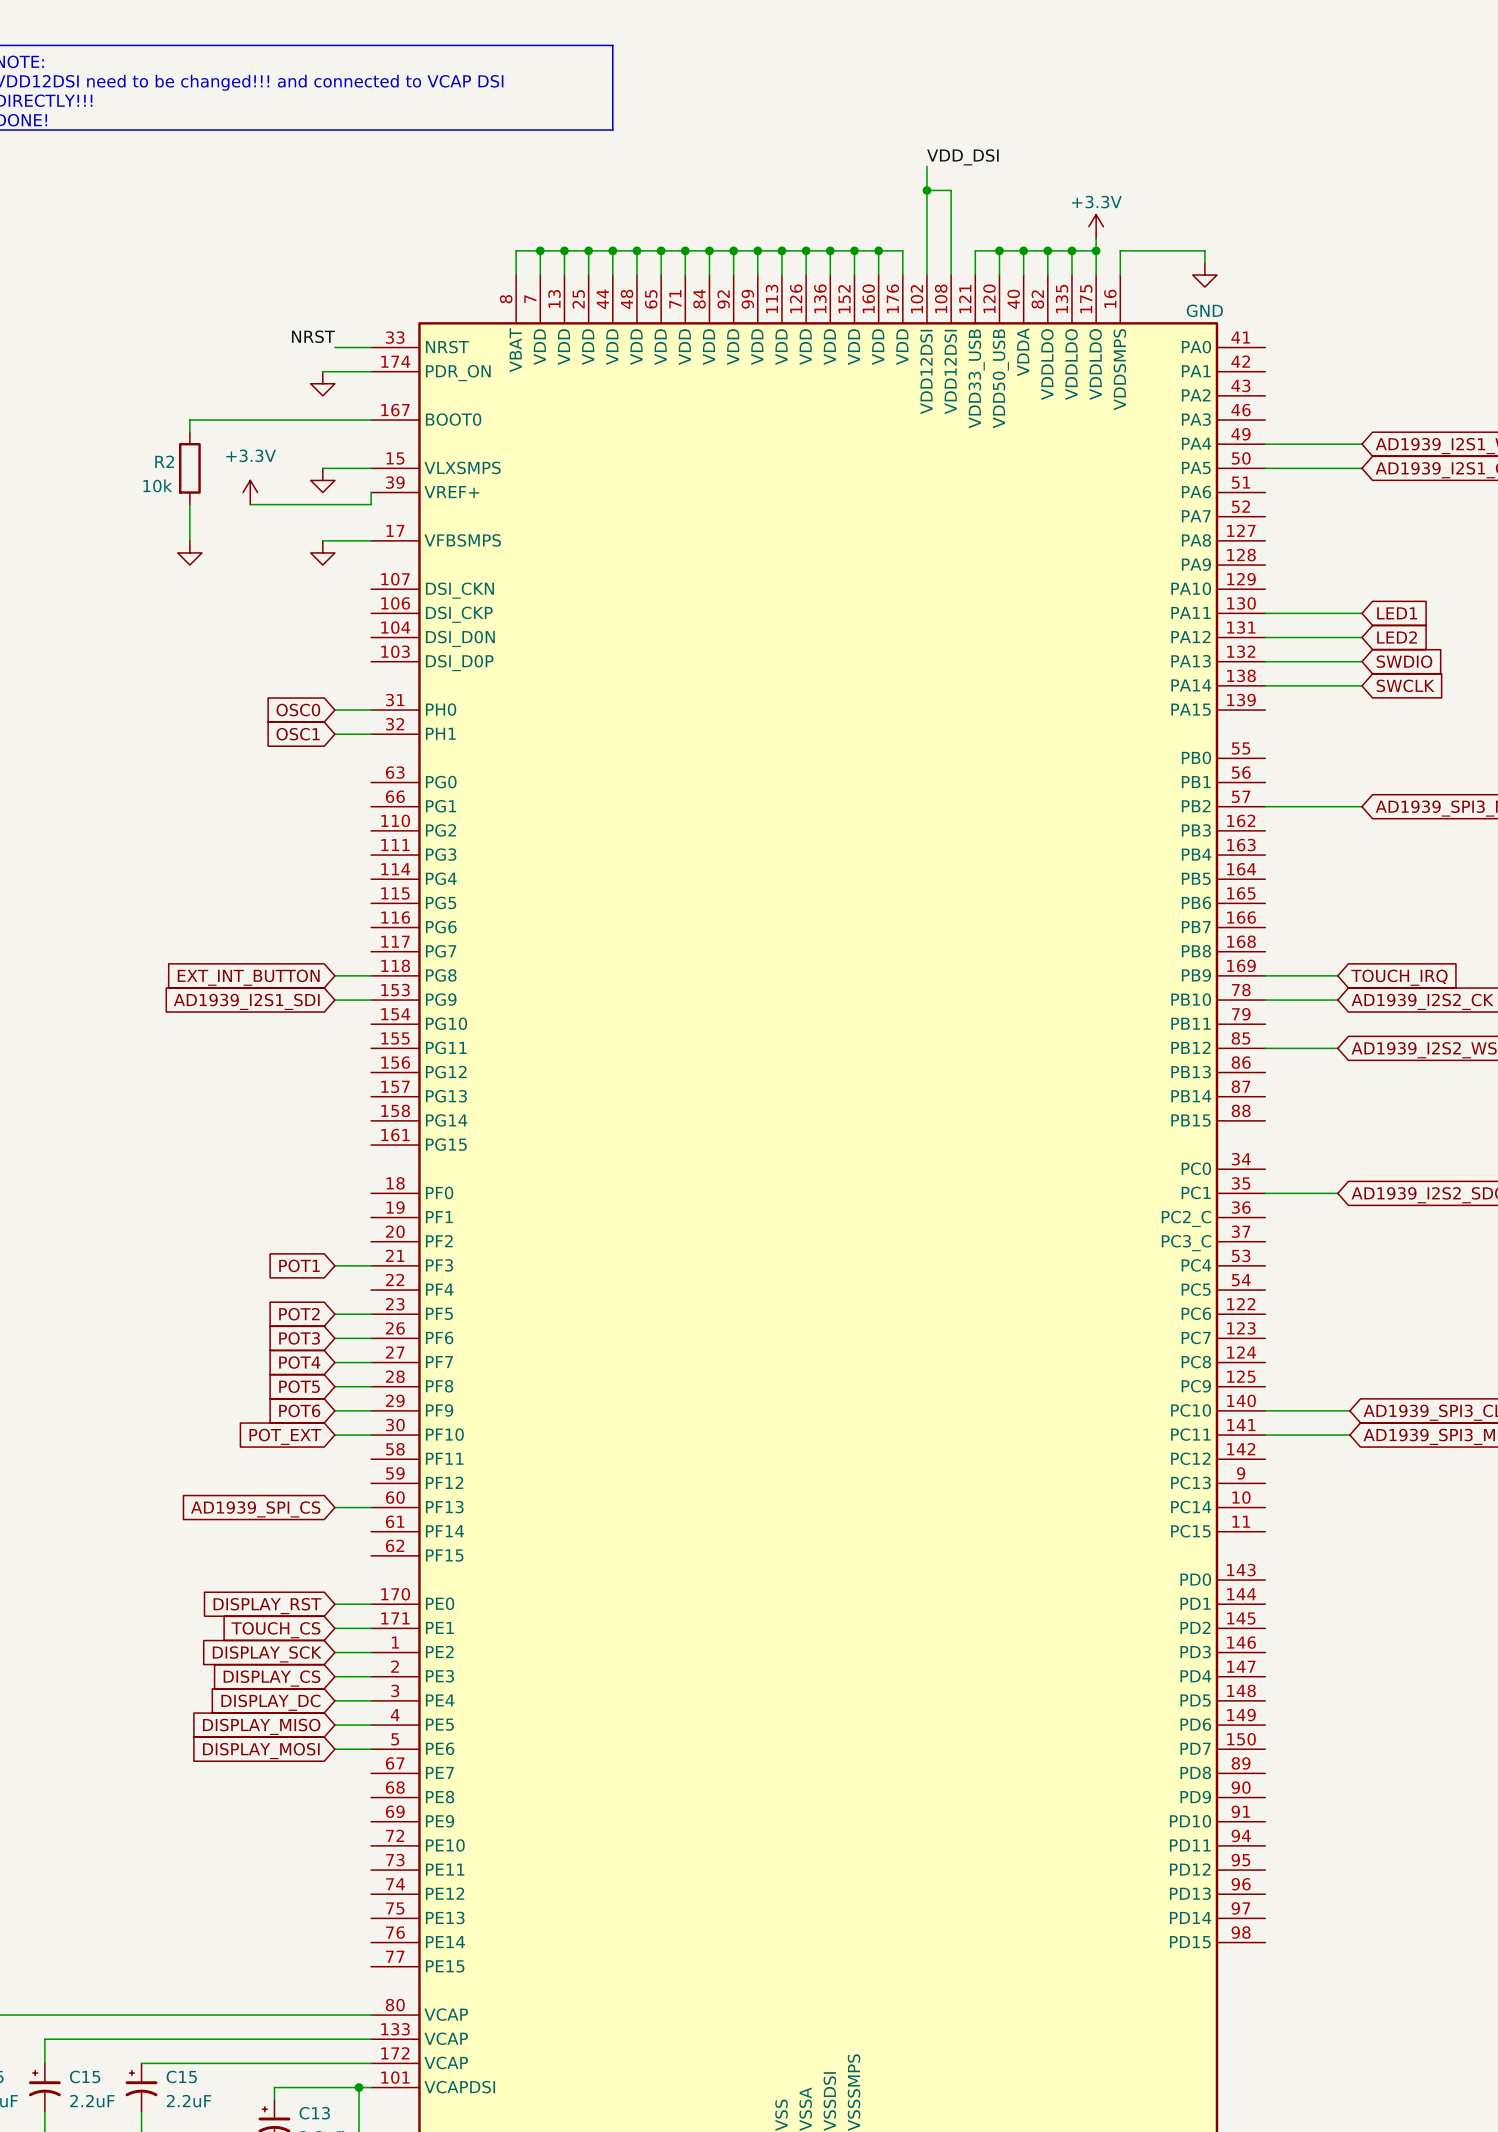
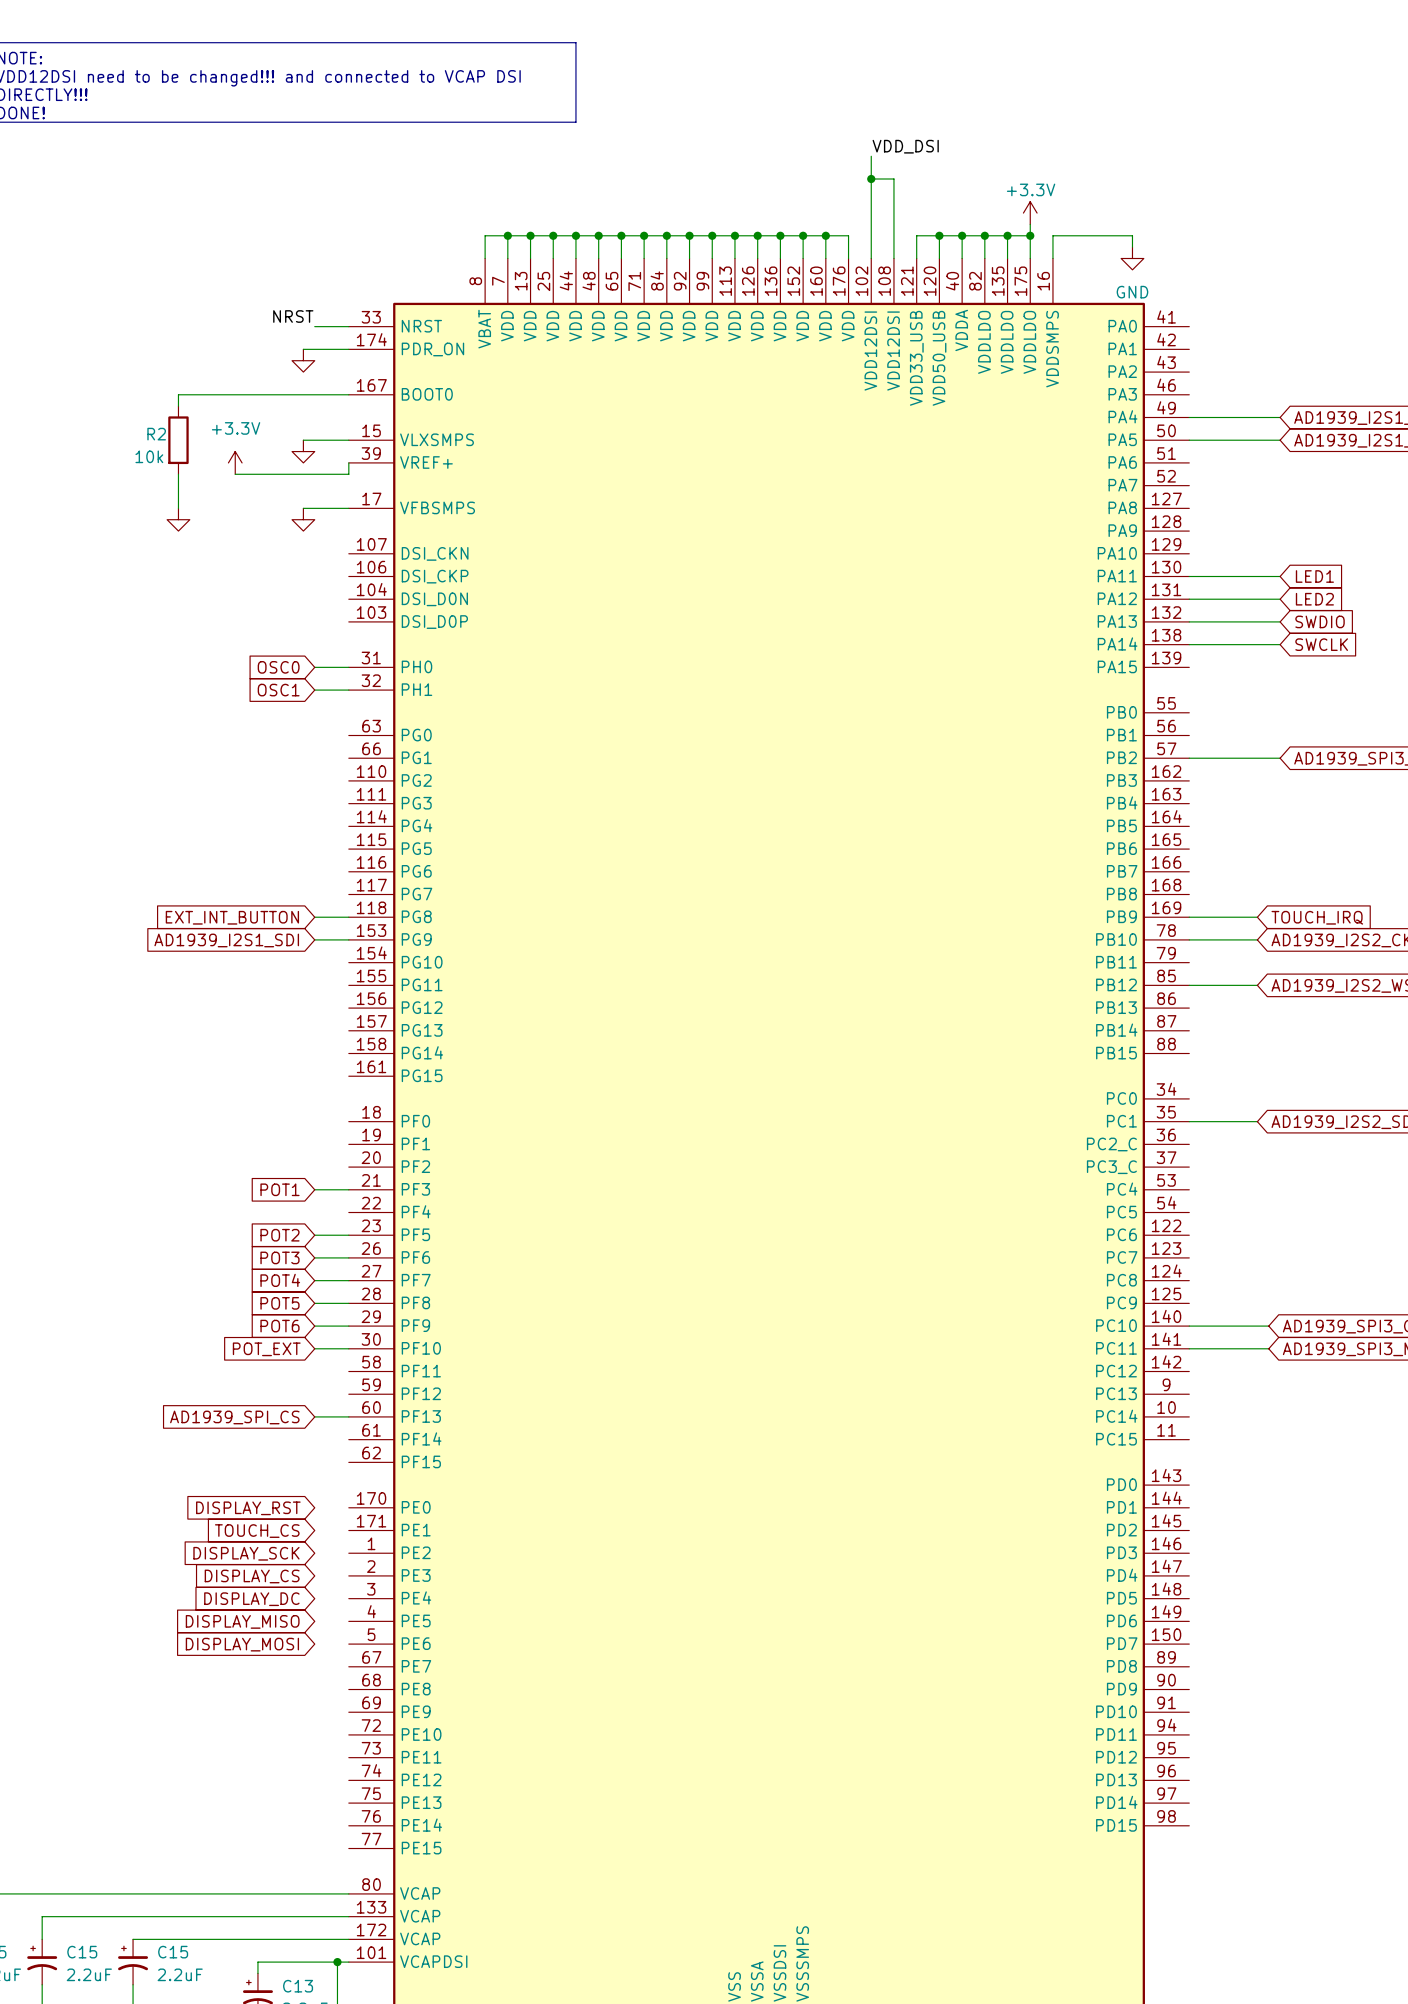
wire: (334, 1604) (371, 1604) -> none
wire: (334, 1628) (371, 1628) -> none
wire: (334, 1652) (371, 1652) -> none
wire: (334, 1676) (371, 1676) -> none
wire: (334, 1700) (371, 1700) -> none
wire: (334, 1725) (371, 1725) -> none
wire: (334, 1749) (371, 1749) -> none

